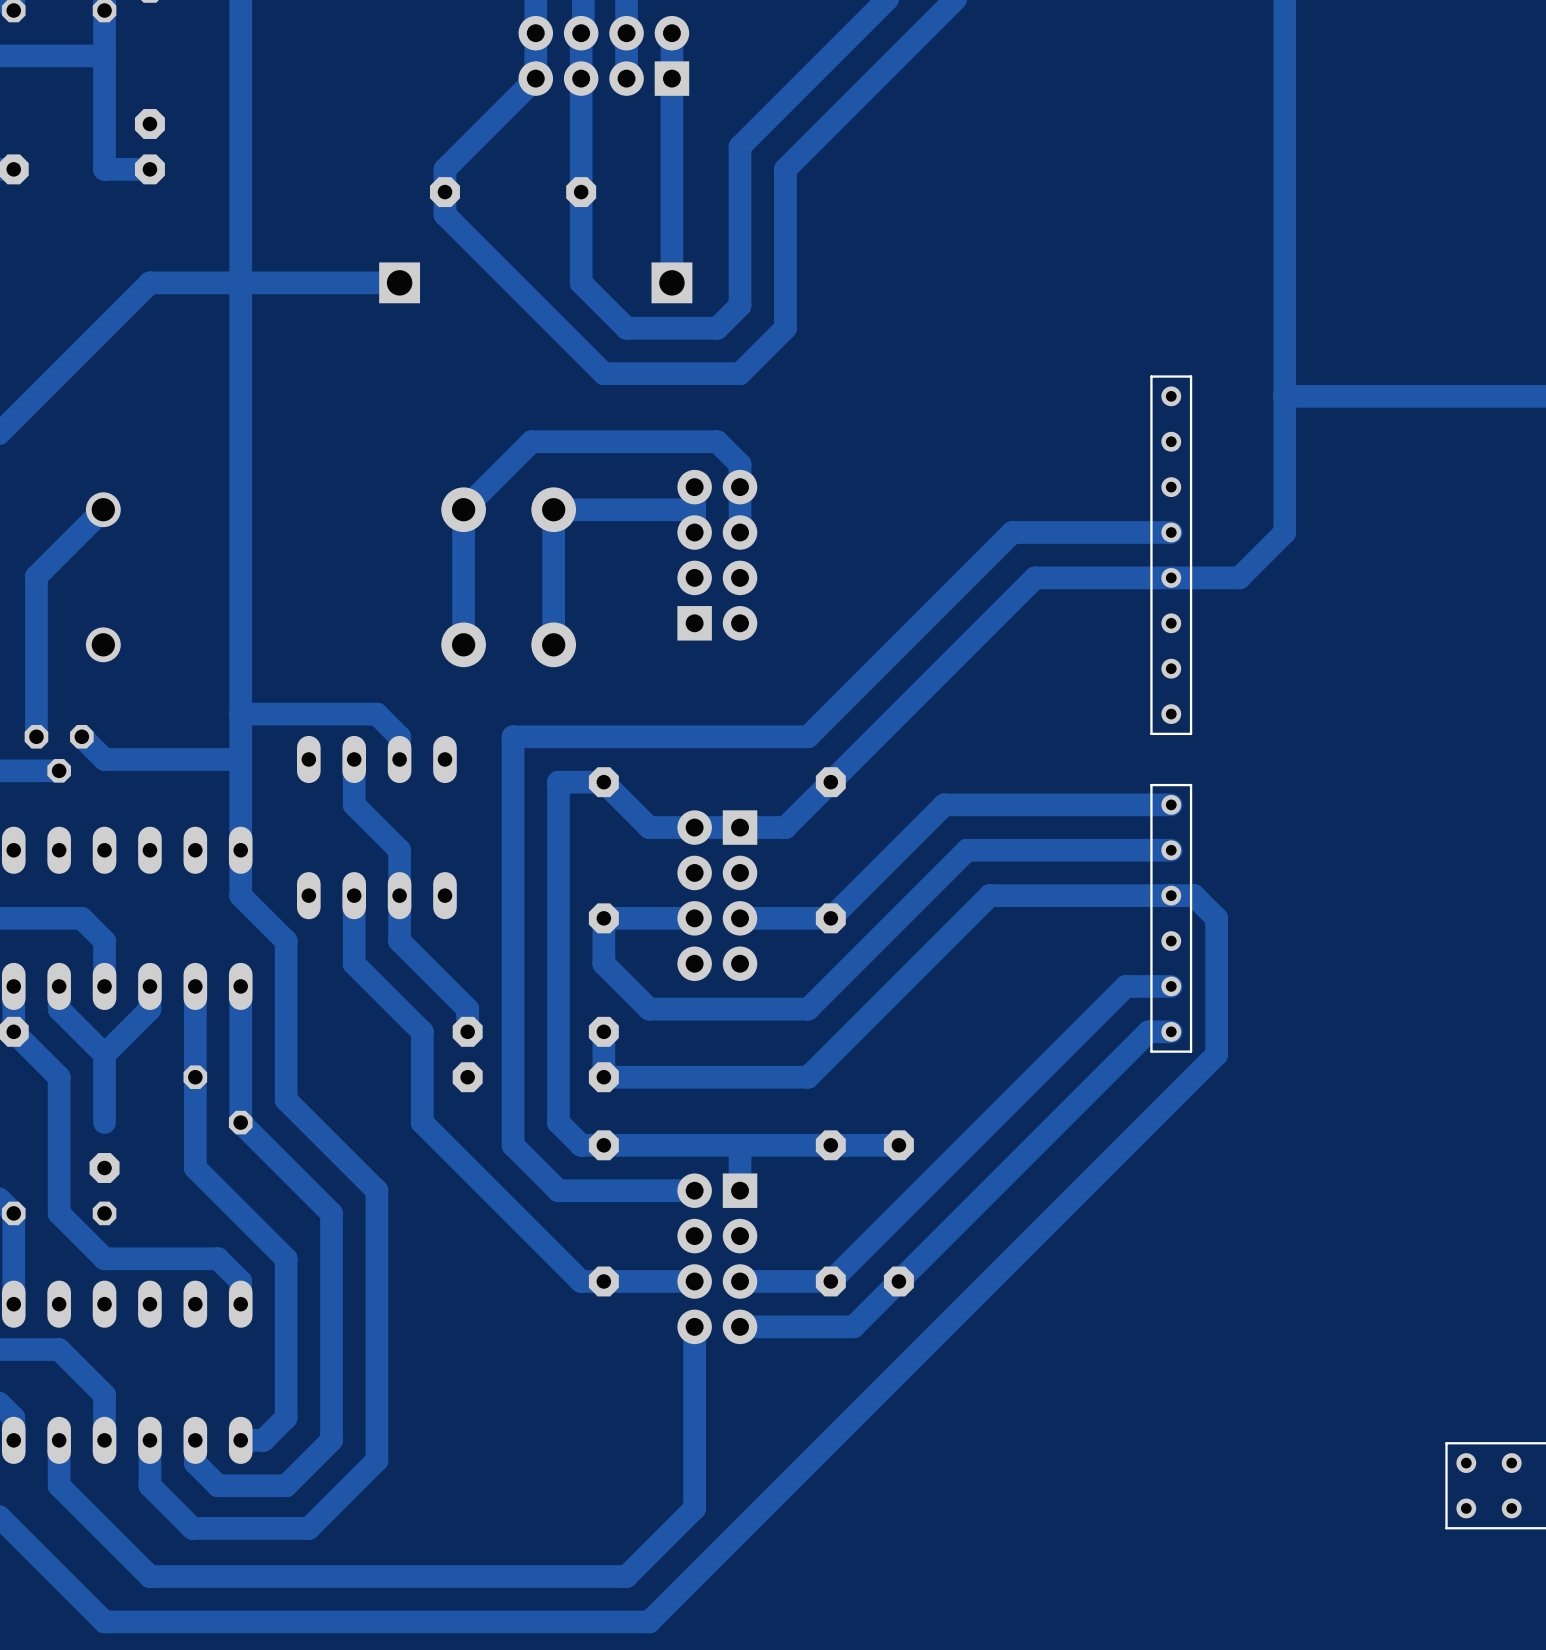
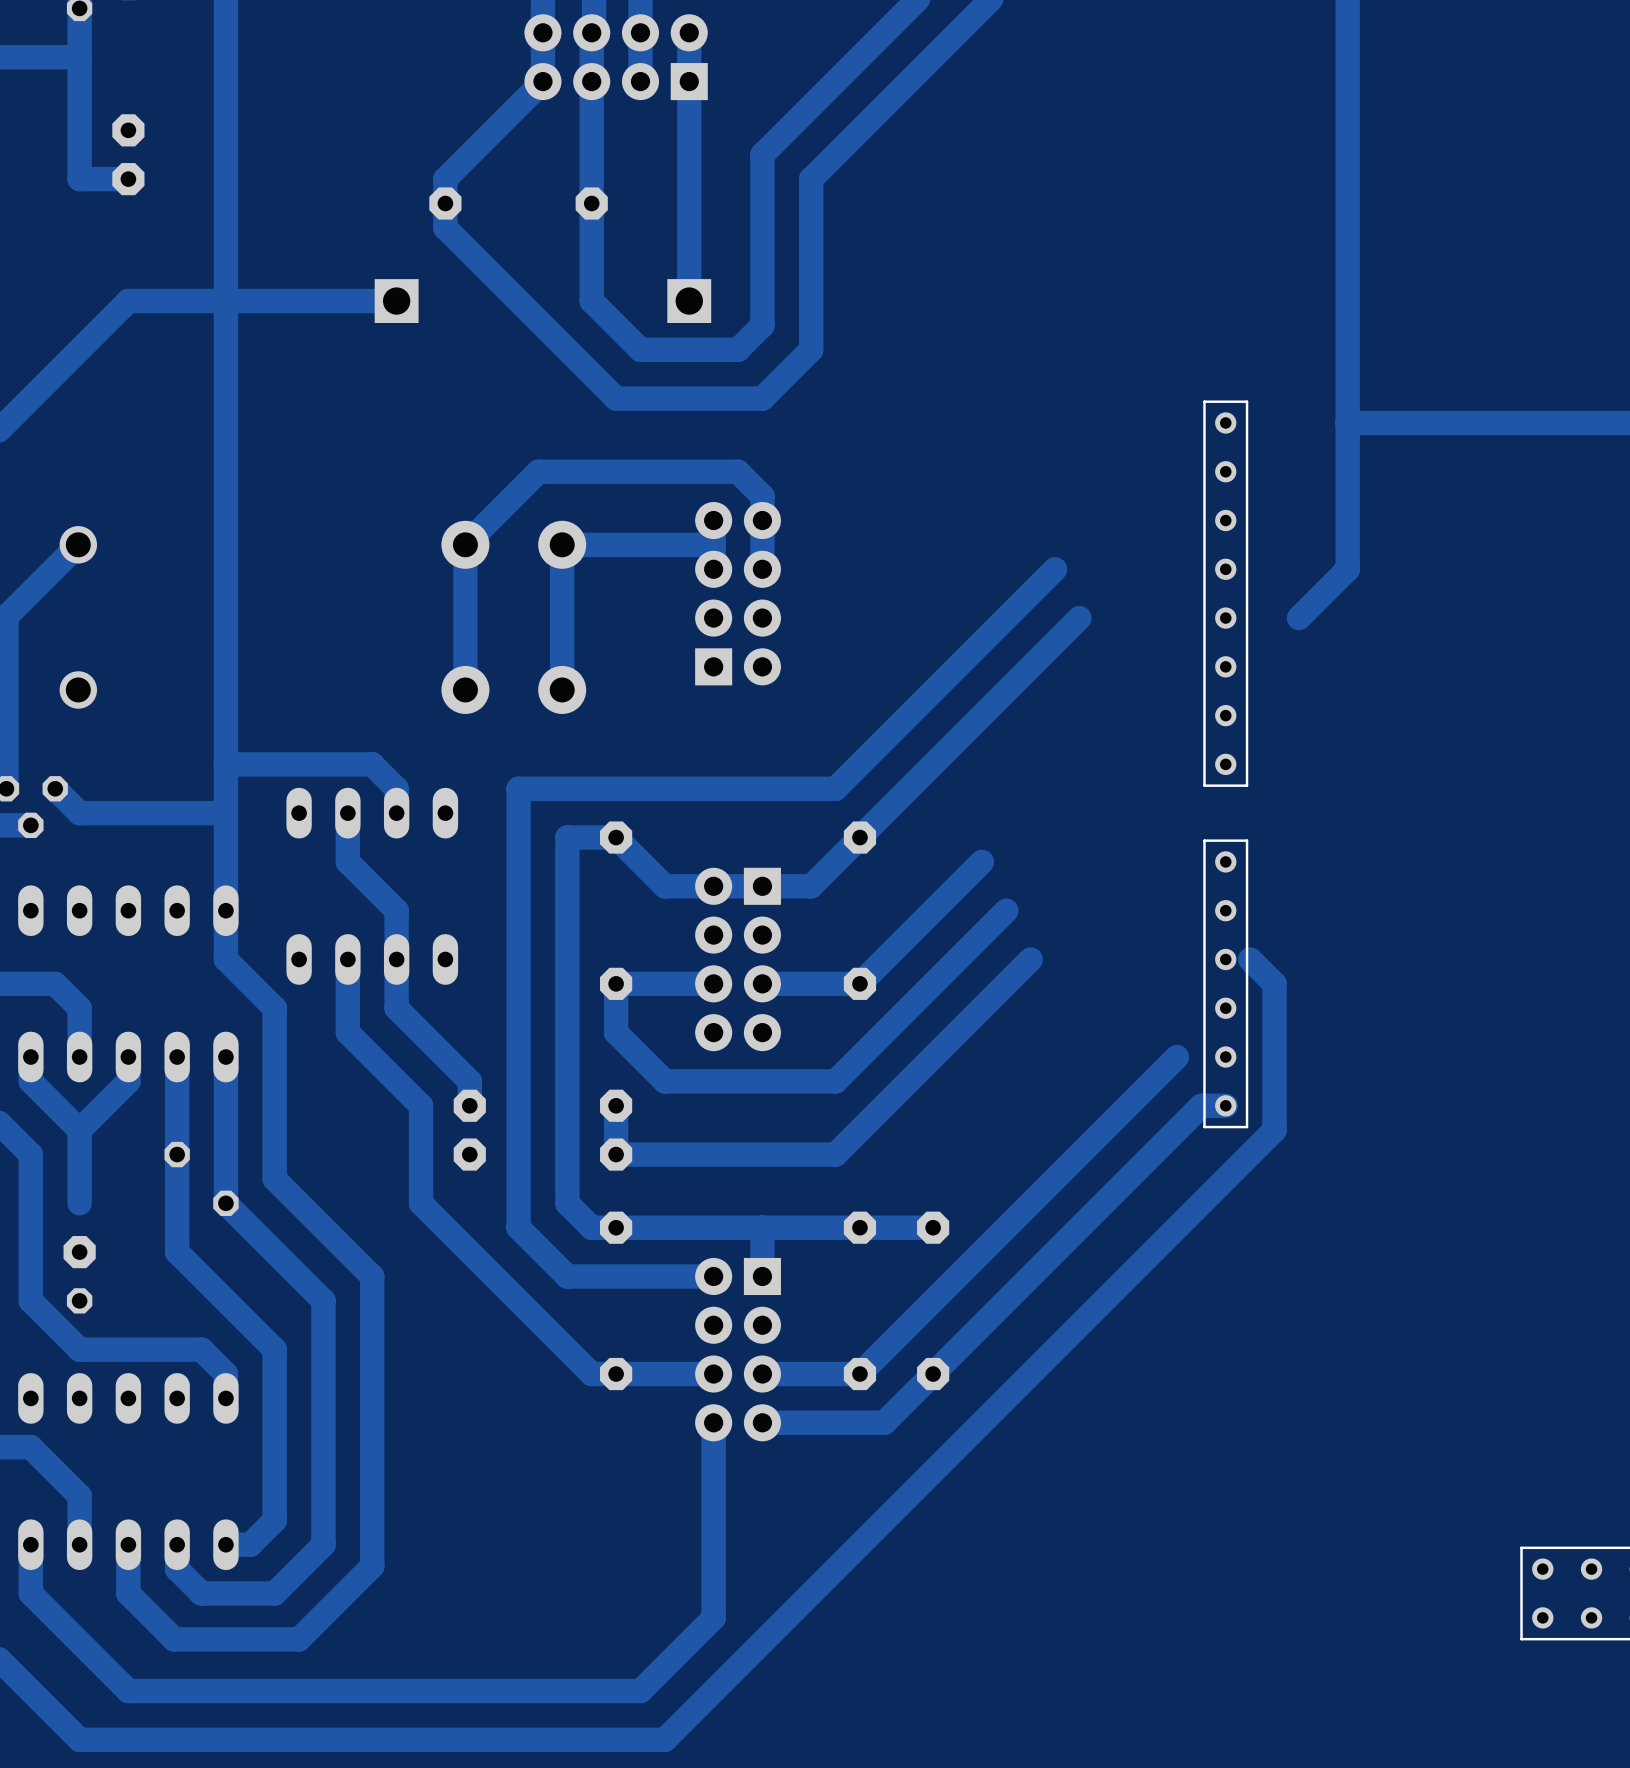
track: (1171, 532) (1012, 532) -> none
track: (1239, 577) (1035, 577) -> none
track: (1171, 804) (944, 804) -> none
track: (1171, 850) (966, 850) -> none
track: (1193, 895) (989, 895) -> none
track: (1171, 986) (1125, 986) -> none

